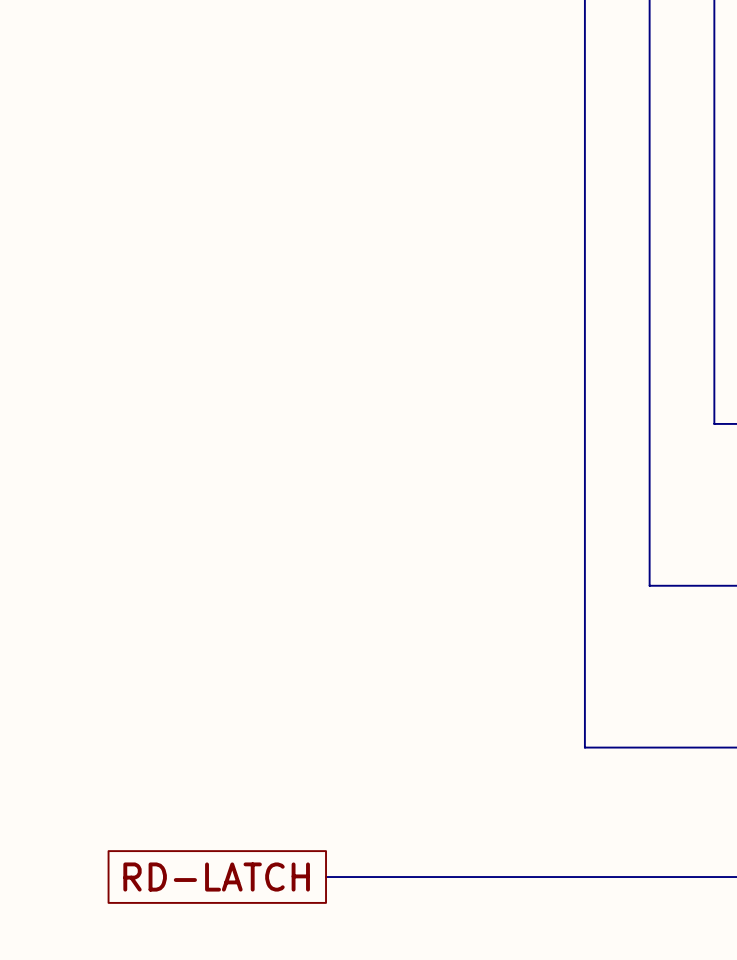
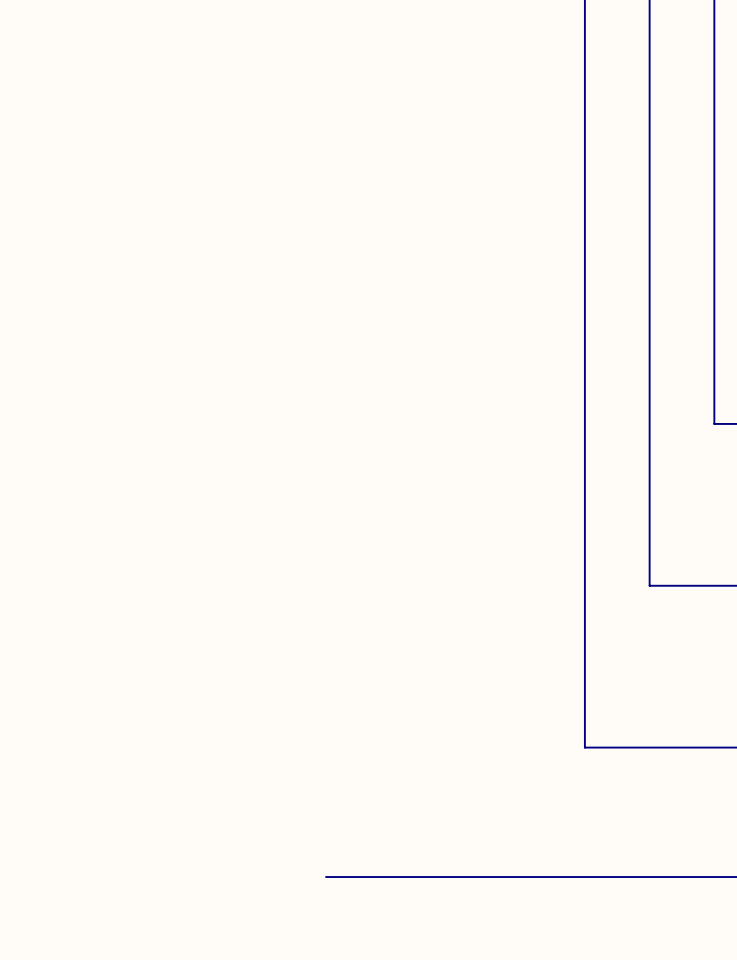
global label: RD-LATCH (216, 877) -> none

